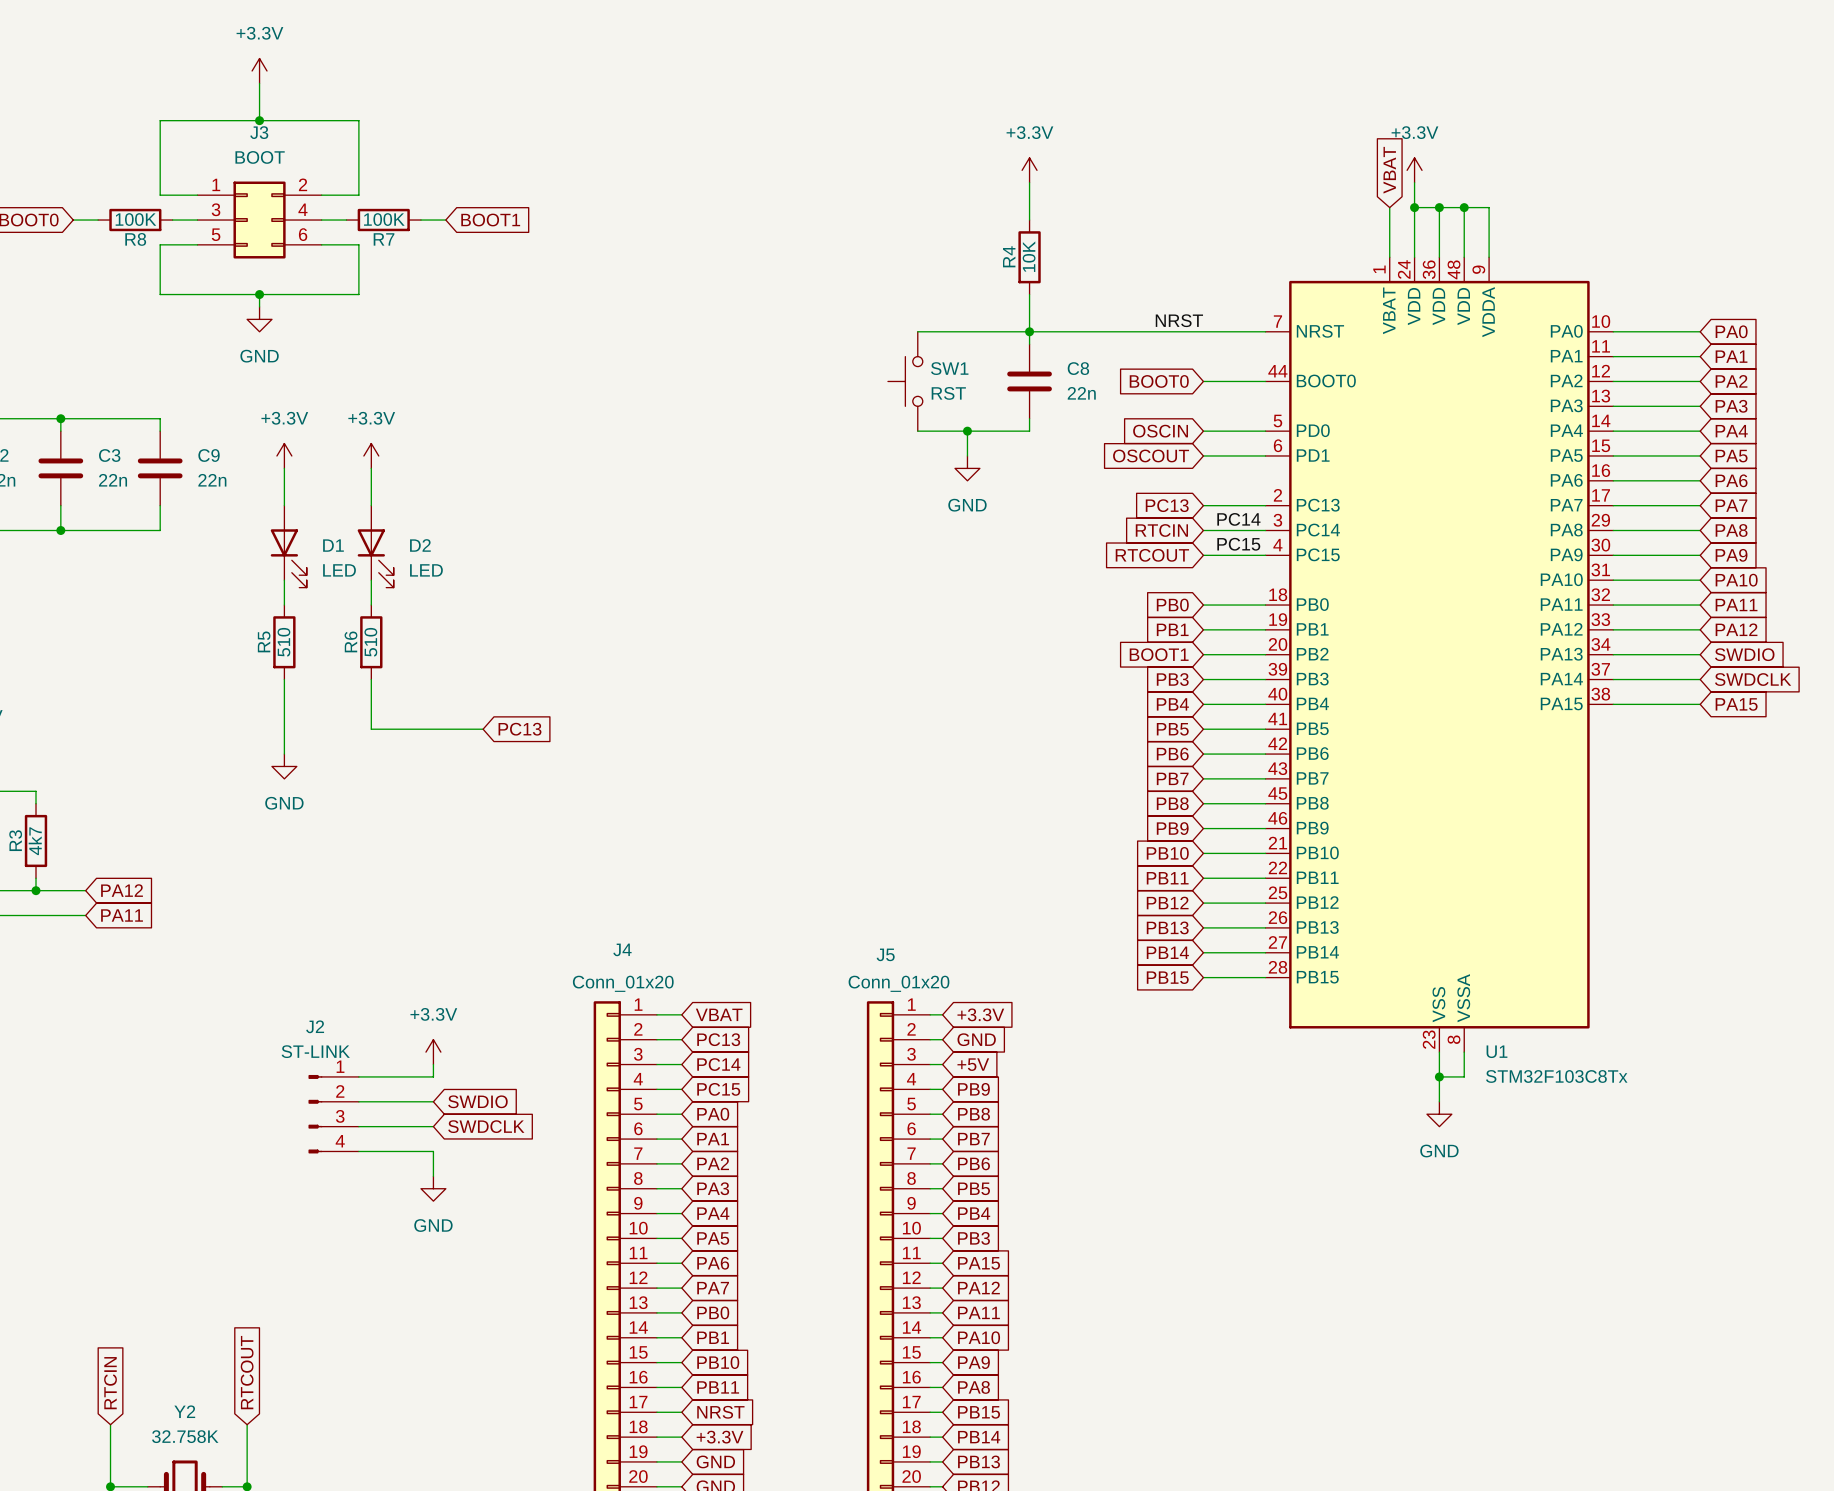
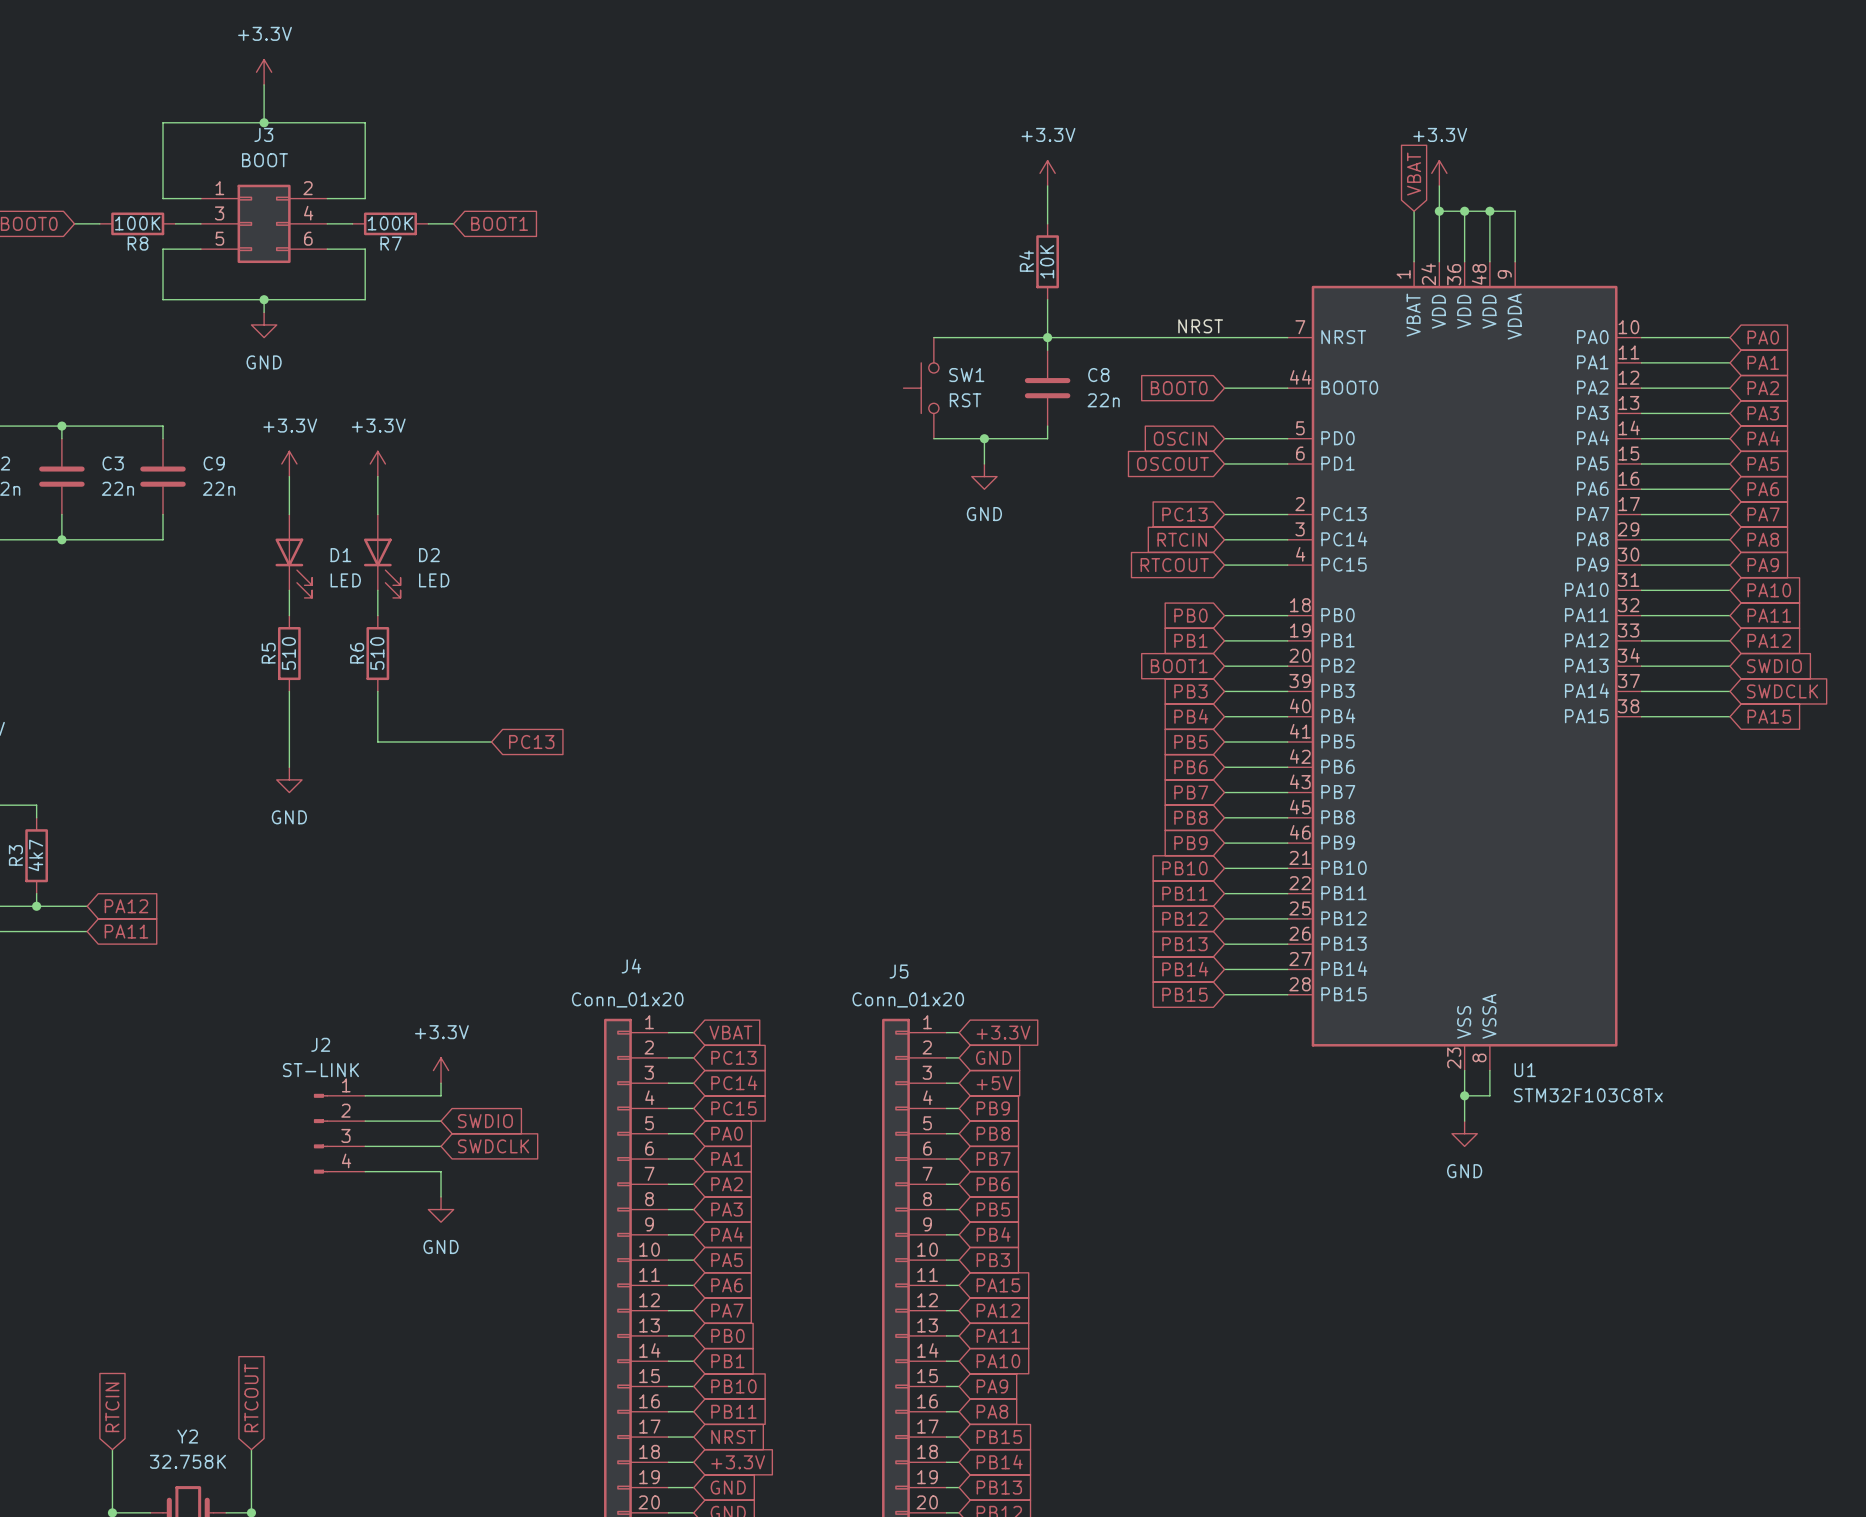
label: PC14 (1238, 519) -> none
label: PC15 (1238, 544) -> none

